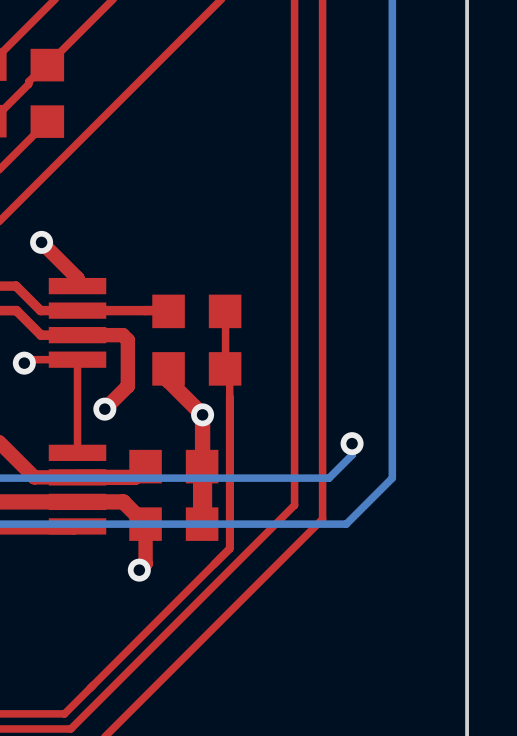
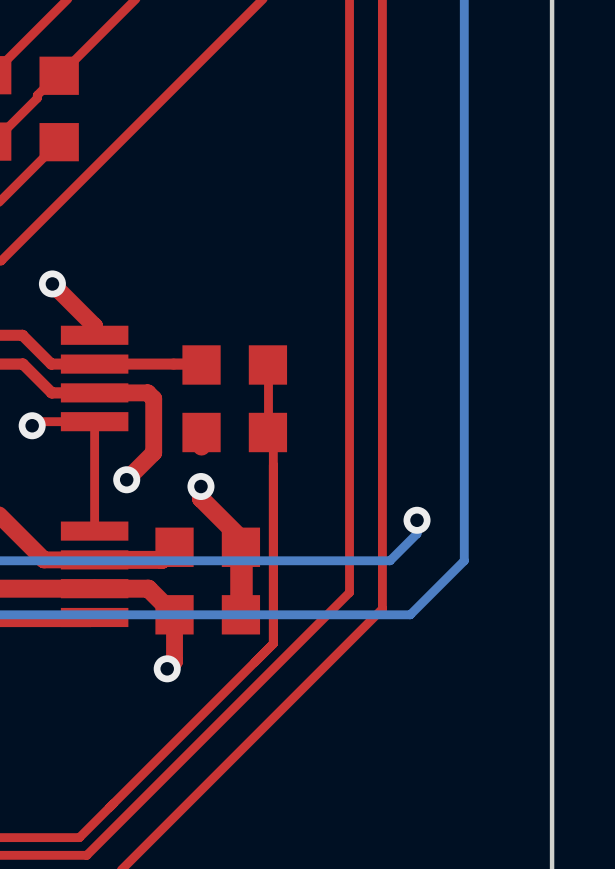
top track: (168, 380) (202, 414) (202, 458) -> (200, 486) (200, 498) (240, 538)
via: none -> (200, 486)
via: (202, 414) -> none

